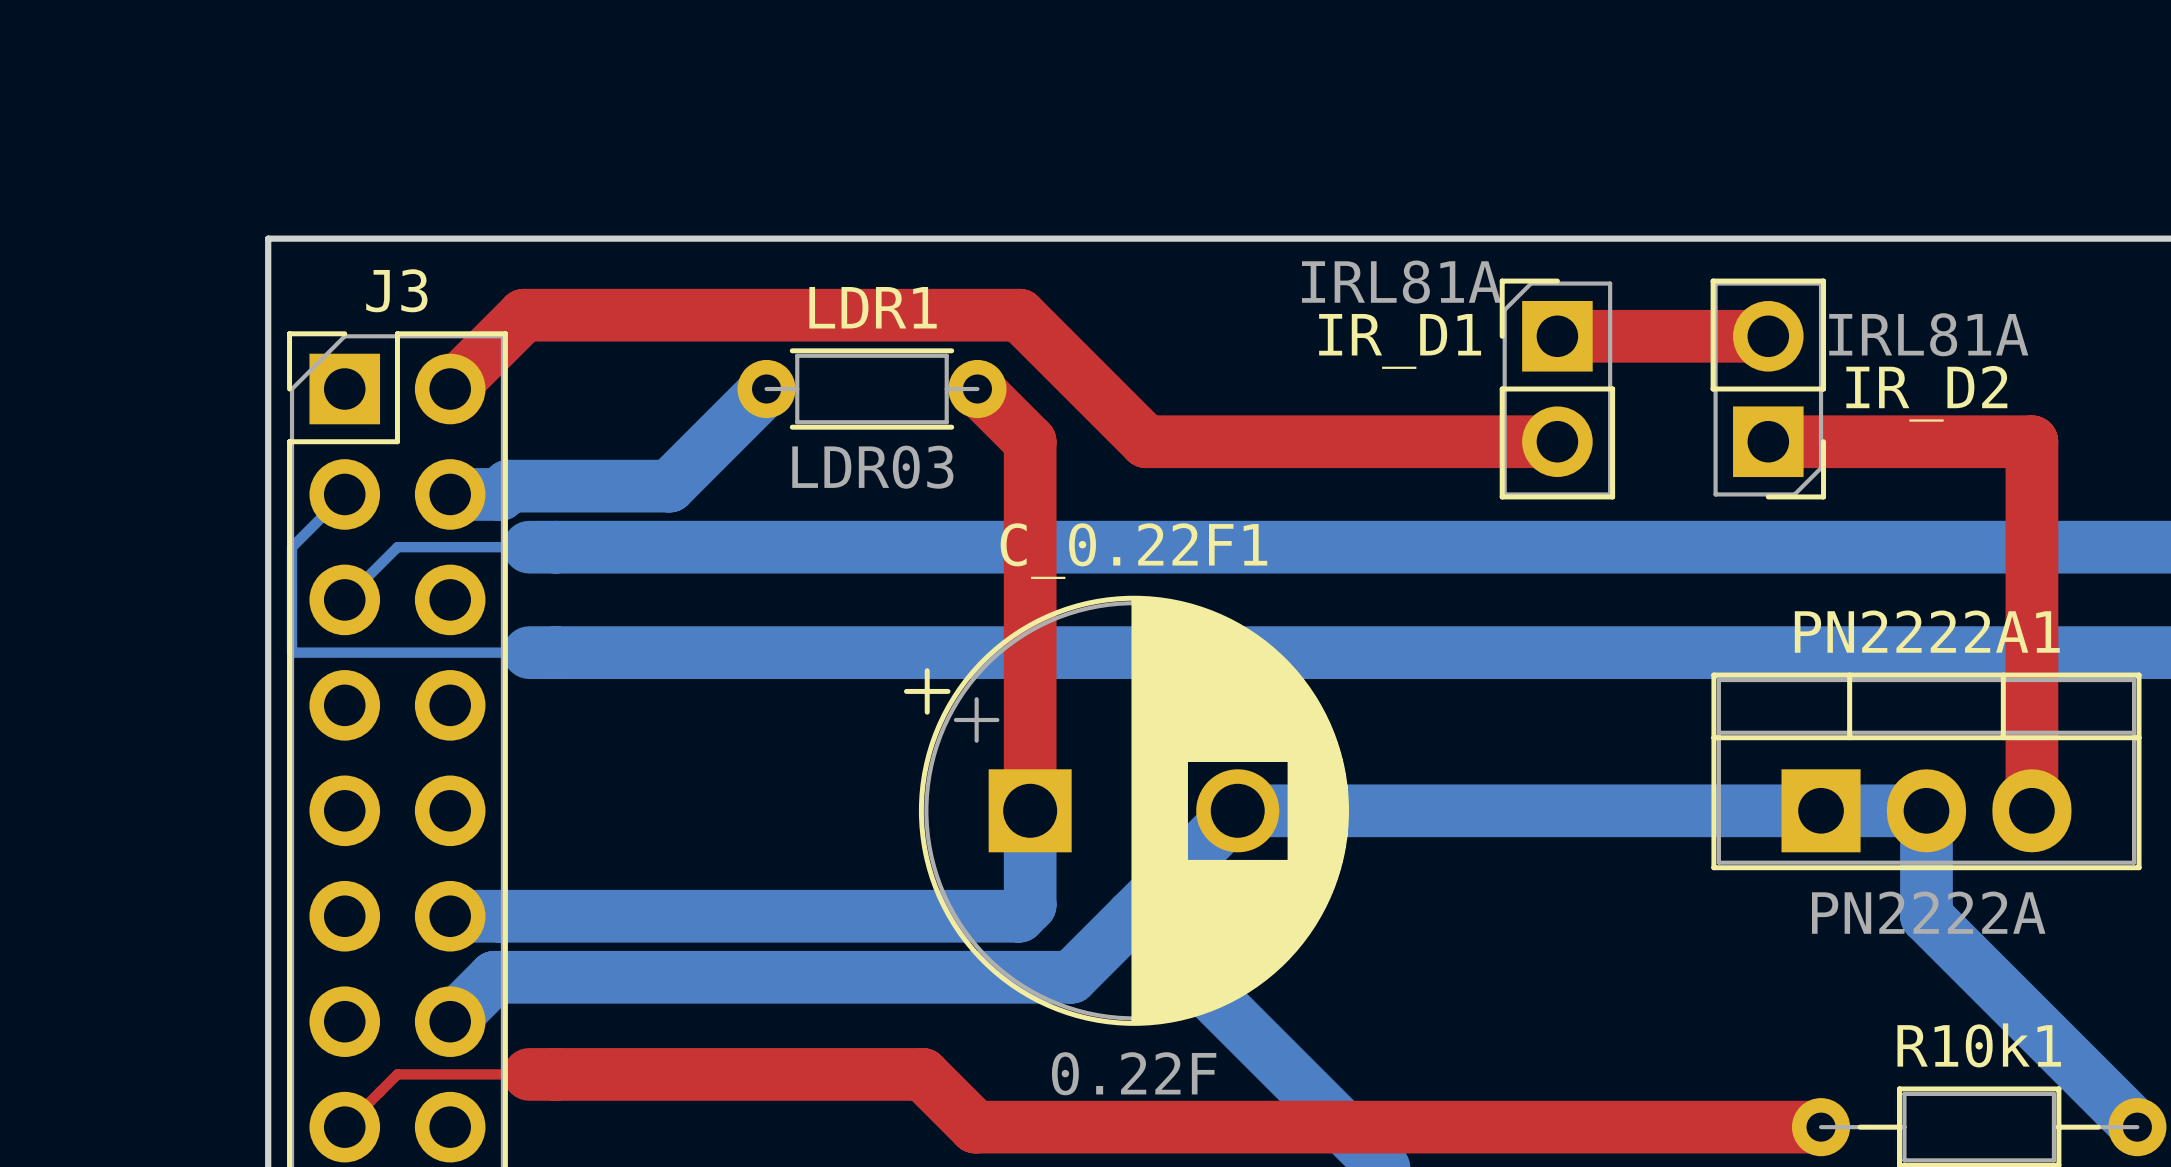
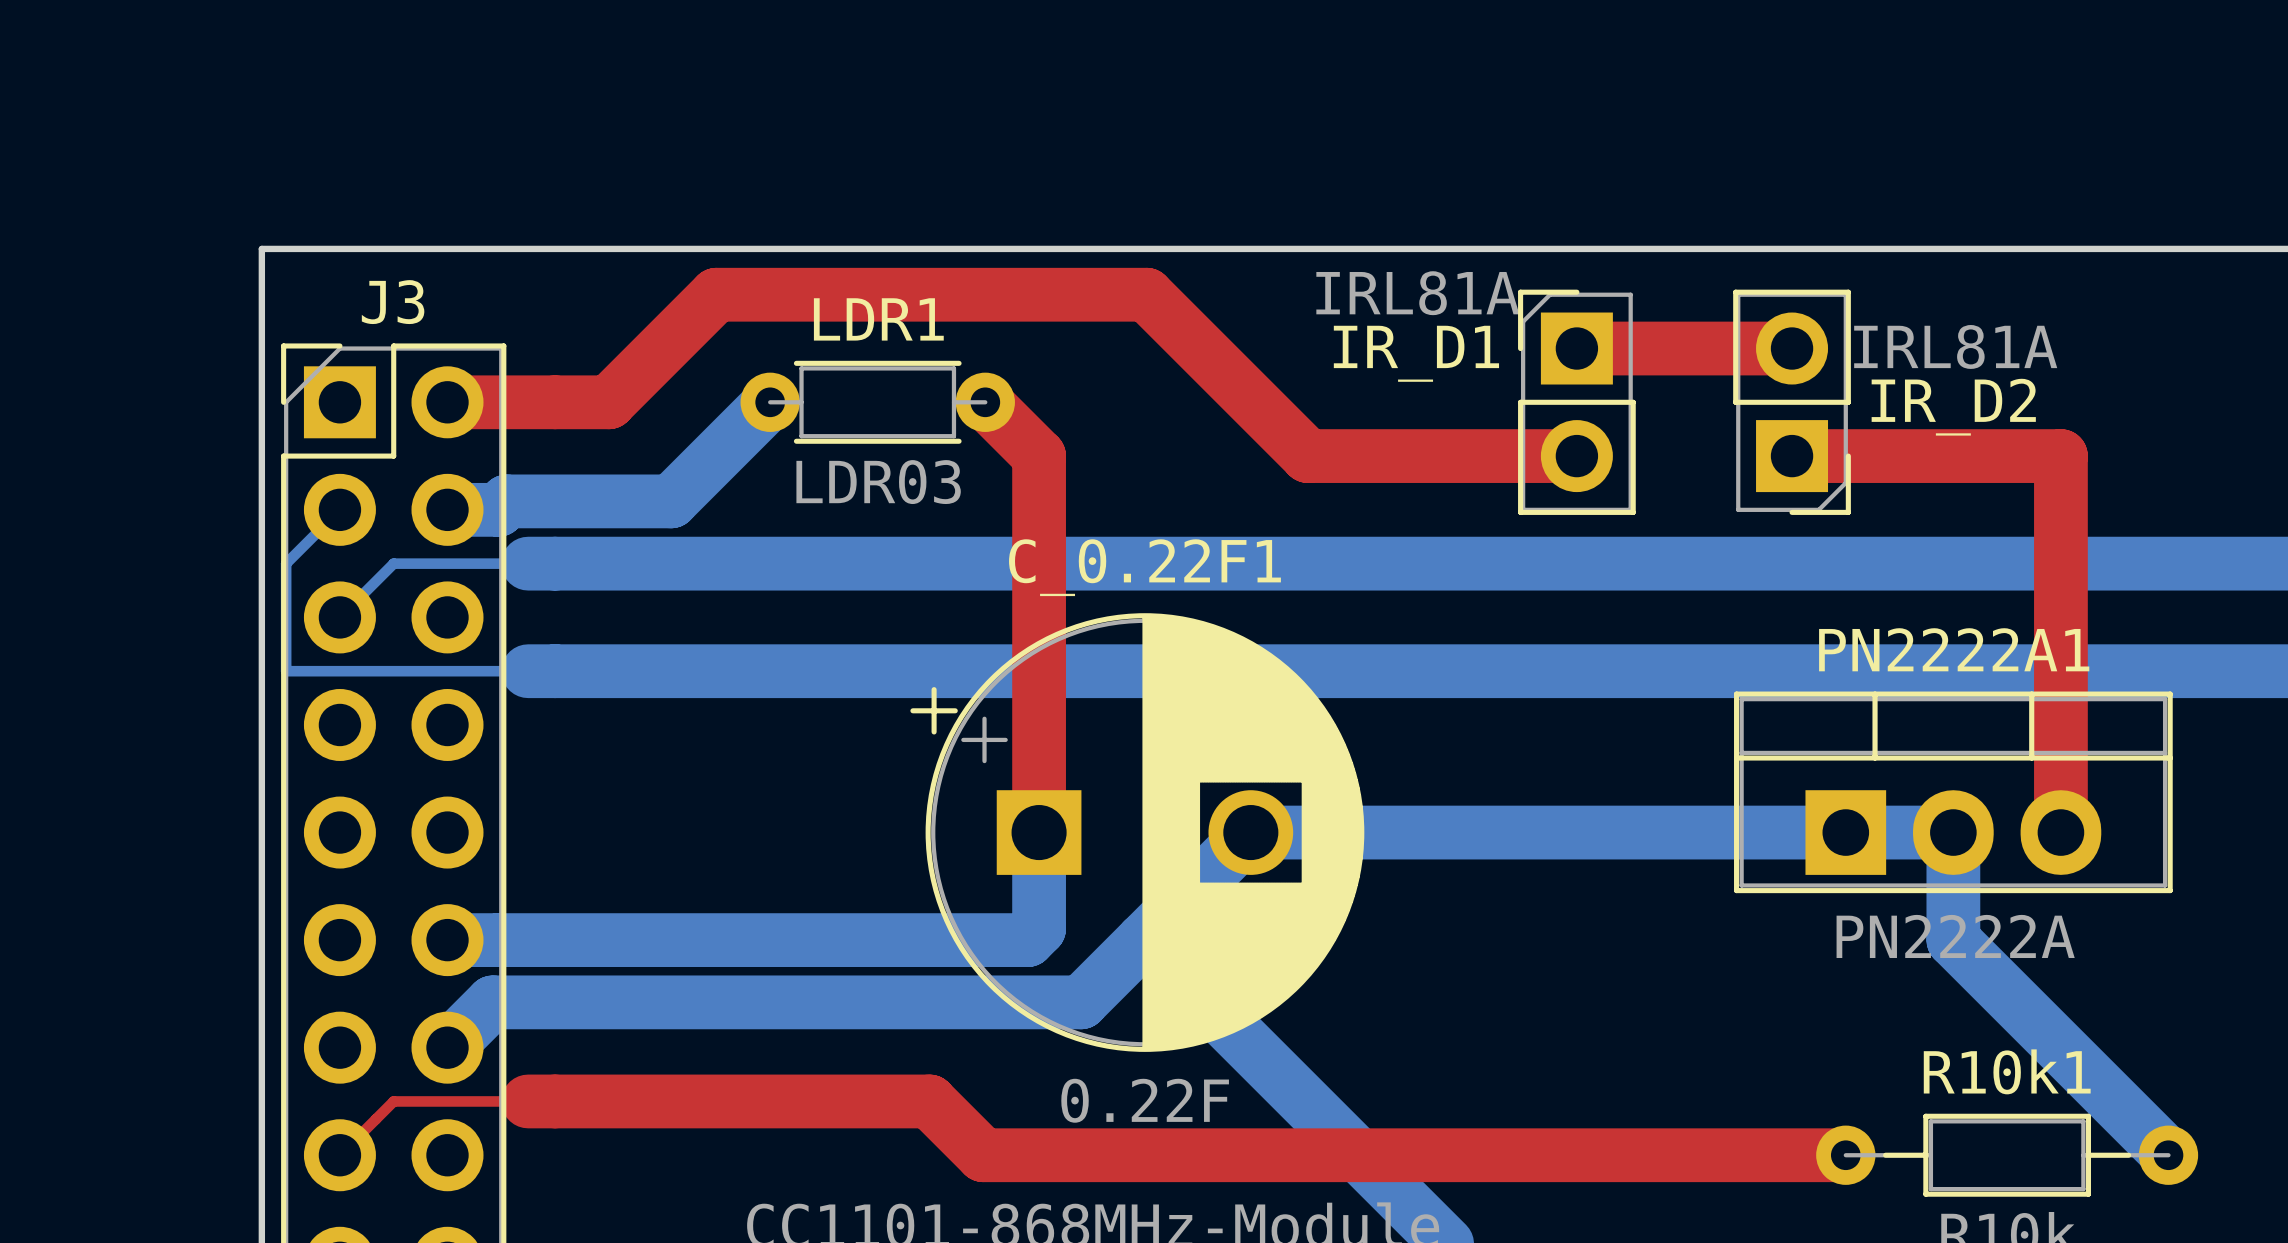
top track: (450, 389) (524, 315) (1019, 315) (1146, 441) (1293, 441) -> (447, 402) (608, 402) (716, 294) (1146, 294) (1307, 456)

